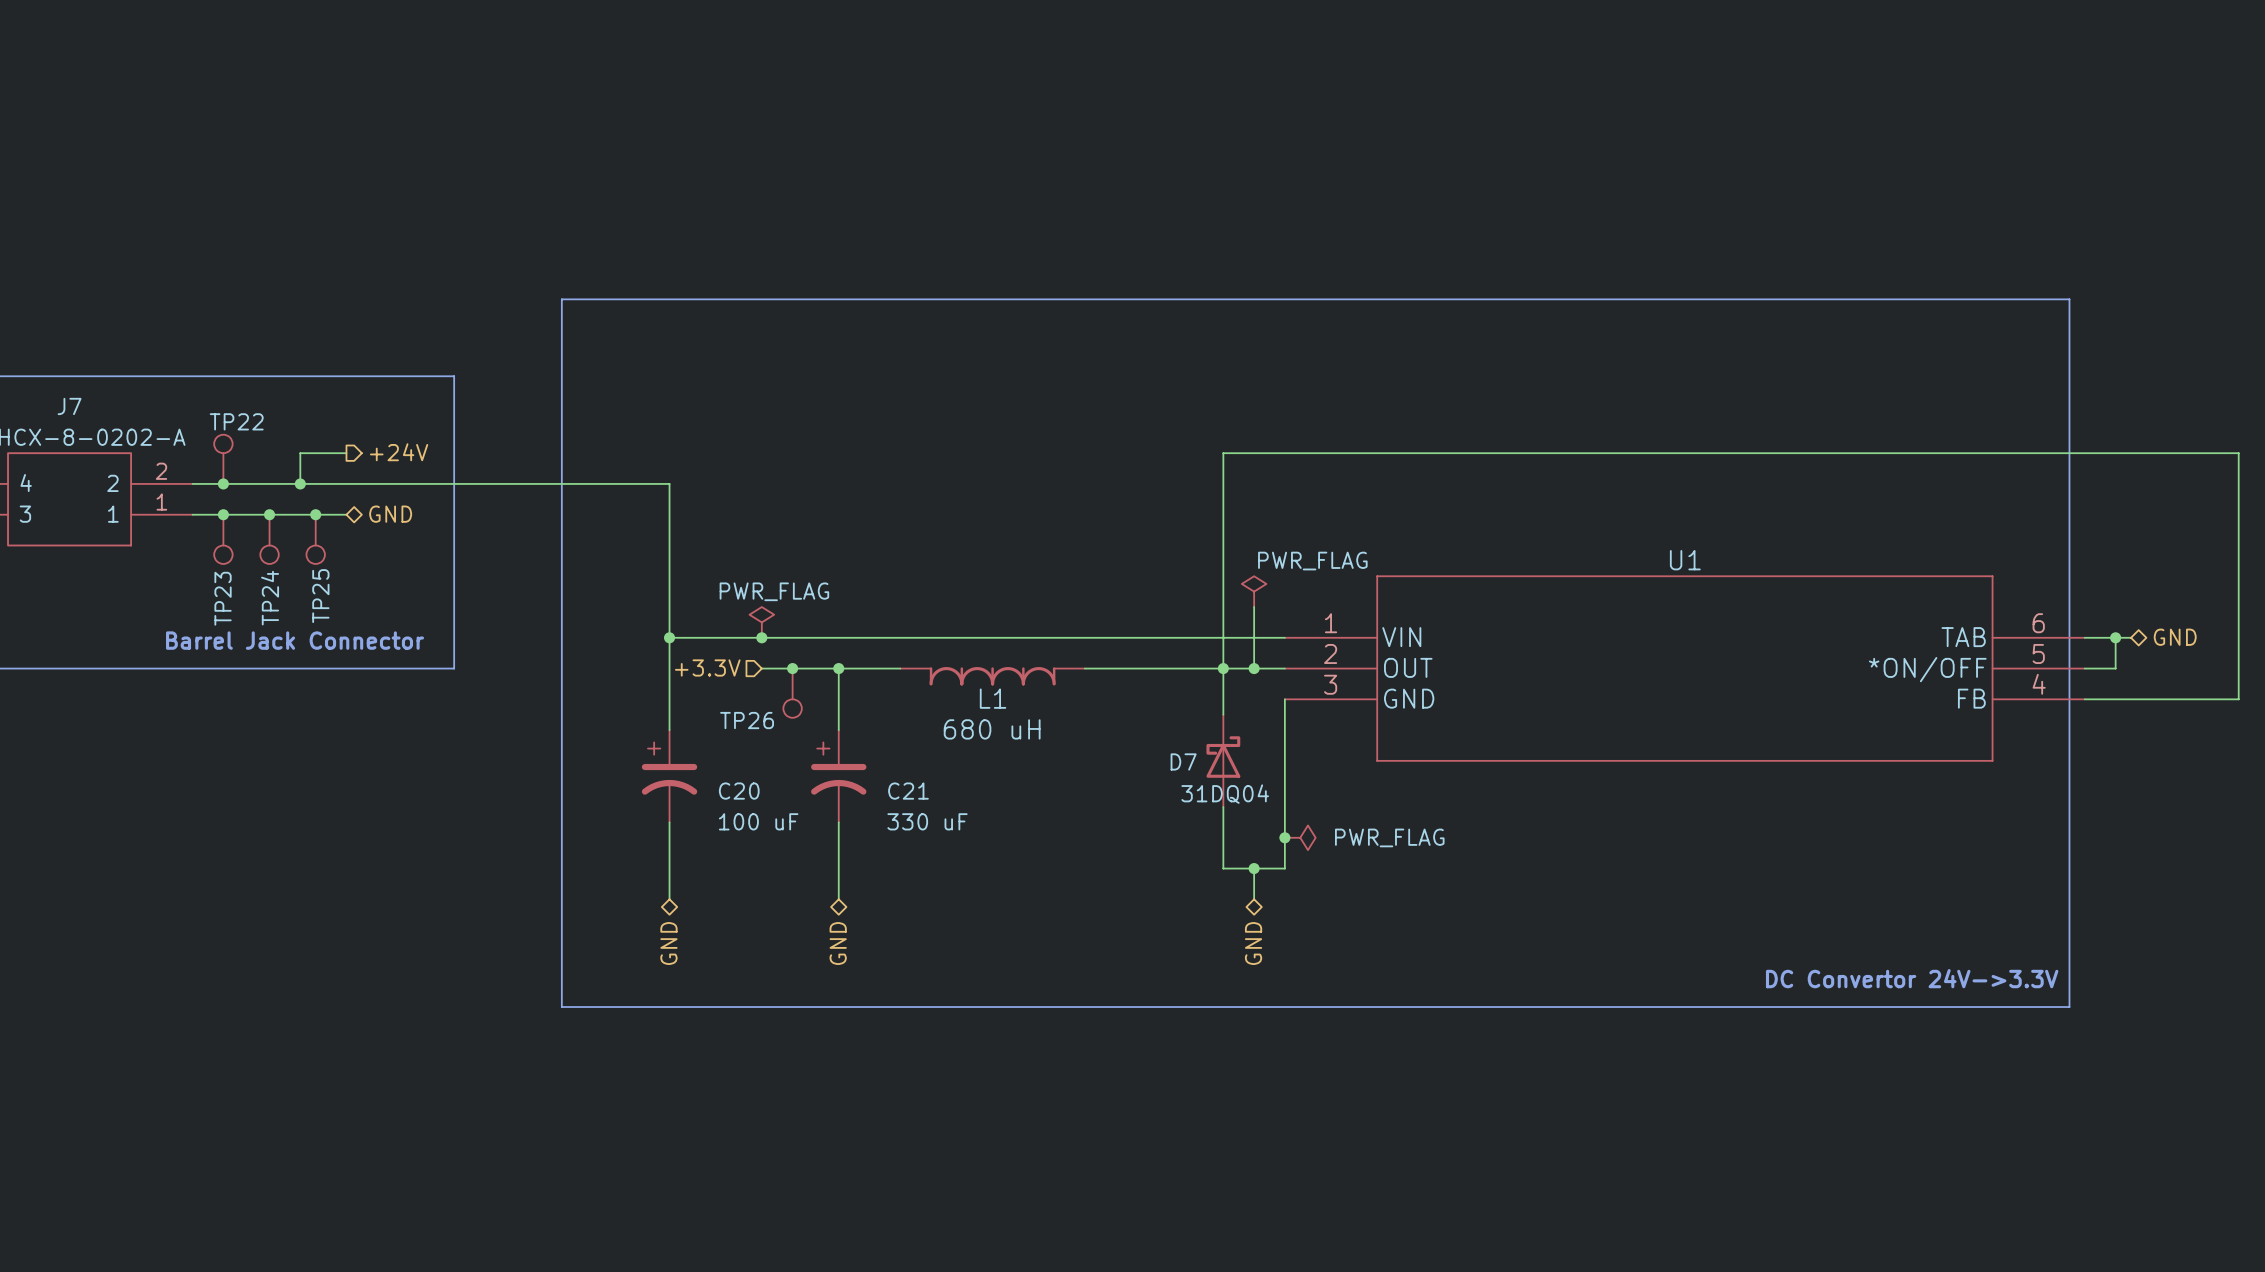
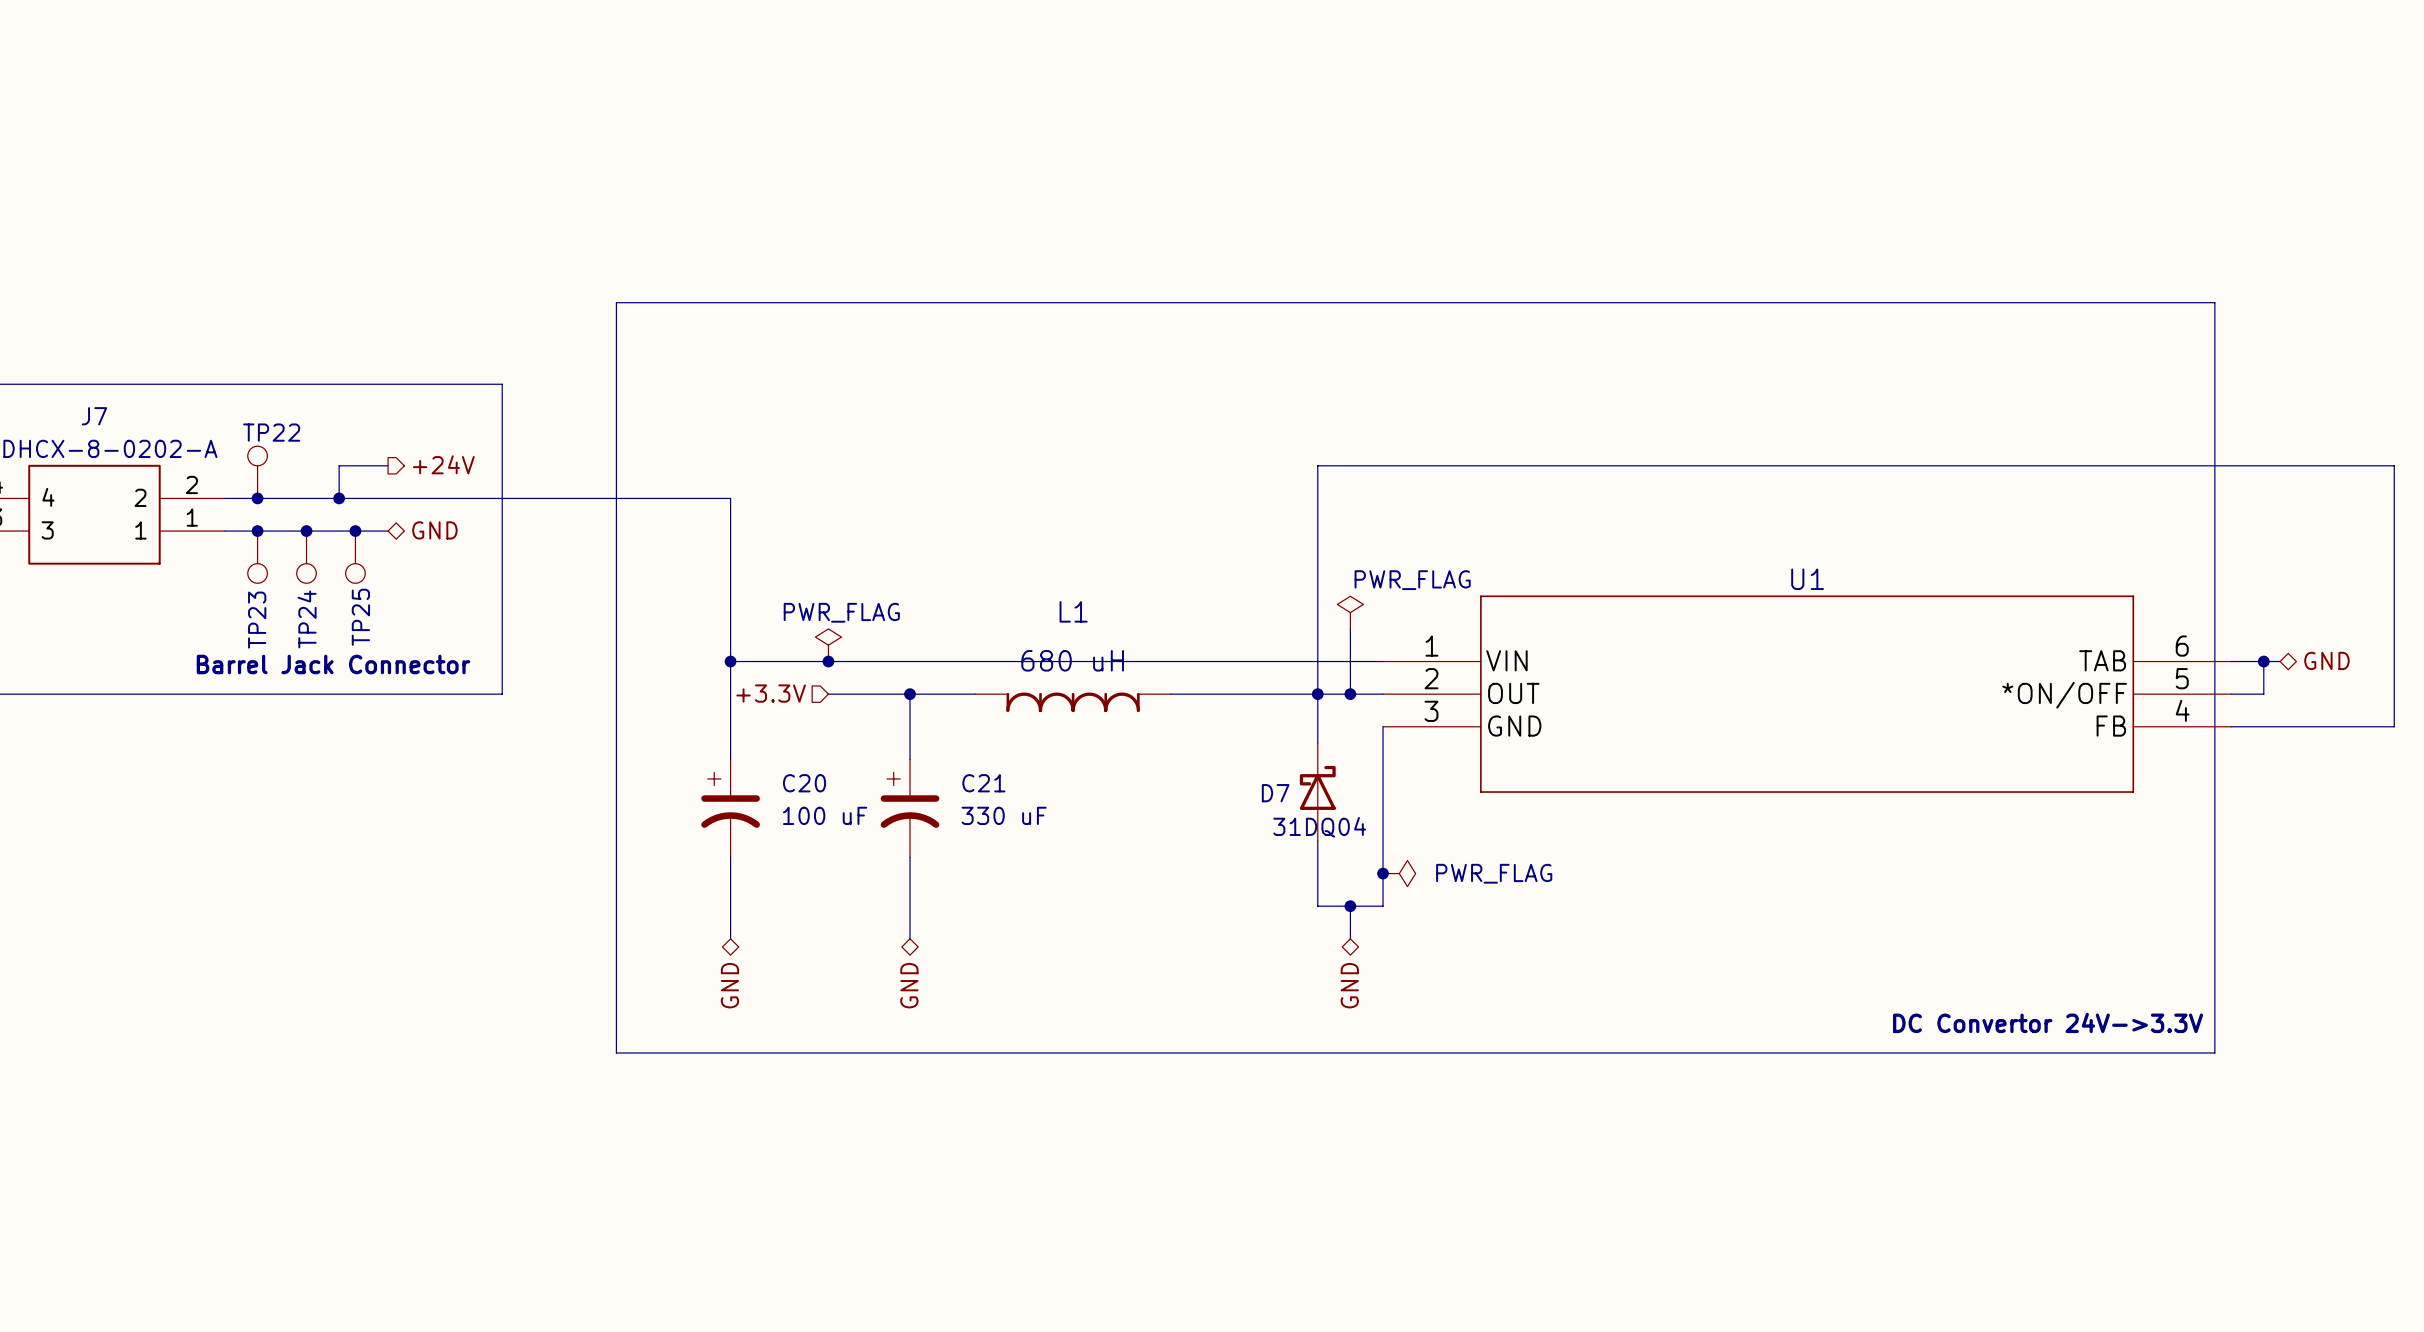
junction: (792, 668) -> none
TP26: (792, 693) -> none
L1 name position: L1 (993, 698) -> L1 (1073, 611)
L1 value position: 680 uH (992, 729) -> 680 uH (1072, 660)
C20 name position: C20 (739, 791) -> C20 (804, 783)
C21 name position: C21 (908, 791) -> C21 (983, 783)
C20 value position: 100 uF (758, 821) -> 100 uF (825, 815)
C21 value position: 330 uF (927, 821) -> 330 uF (1004, 815)

